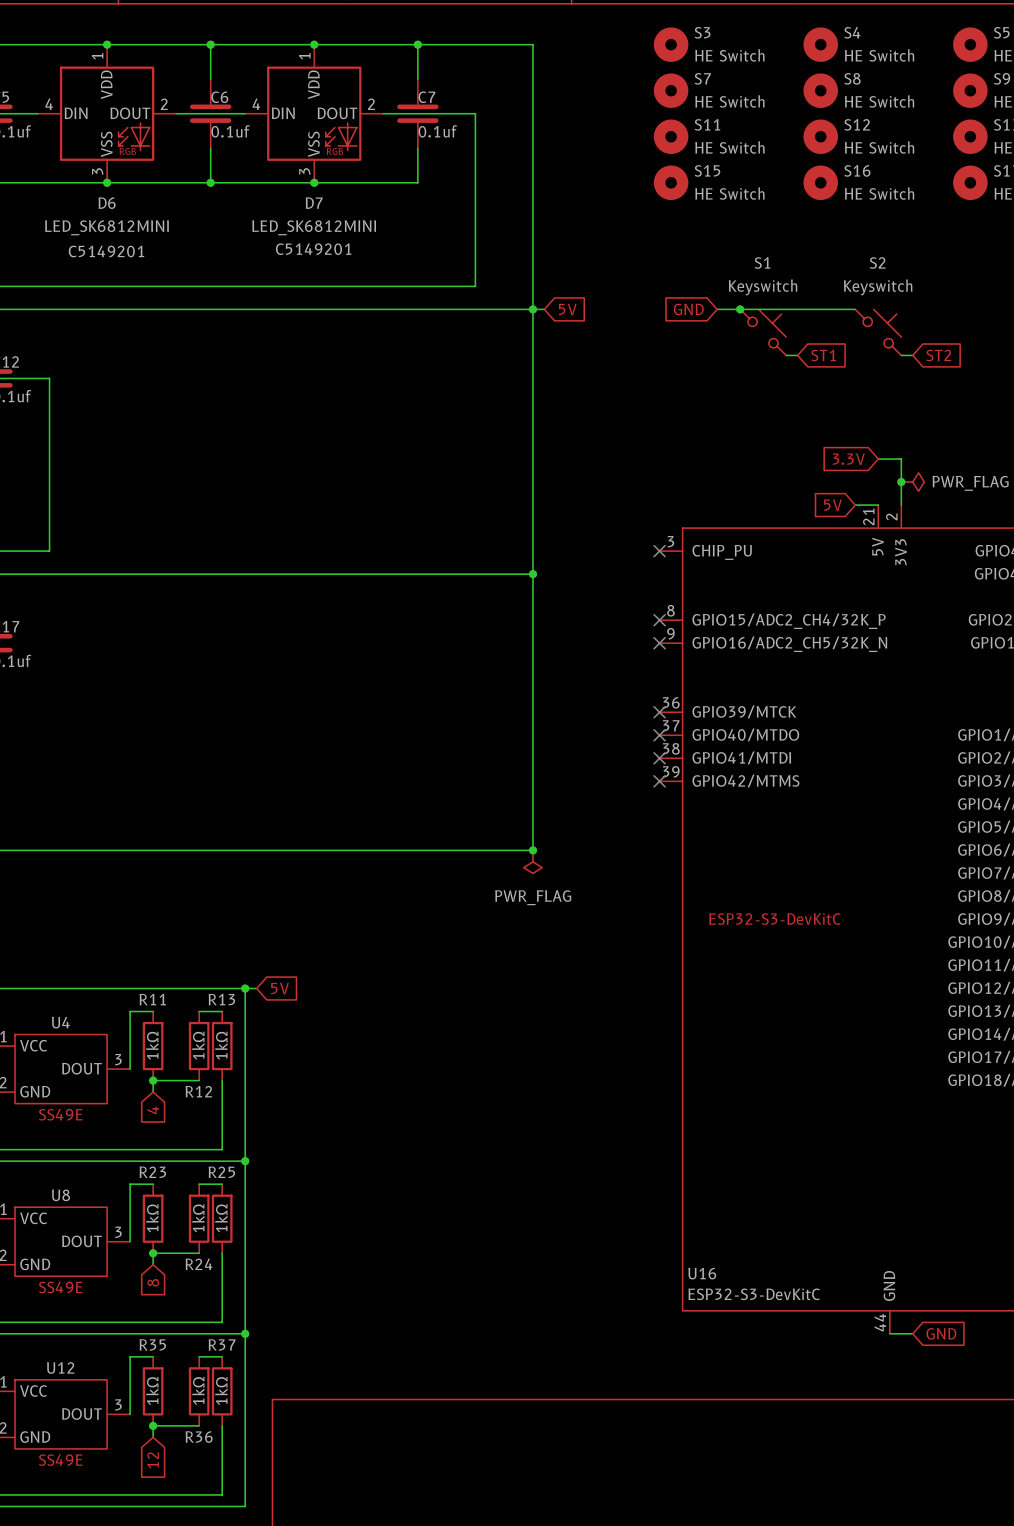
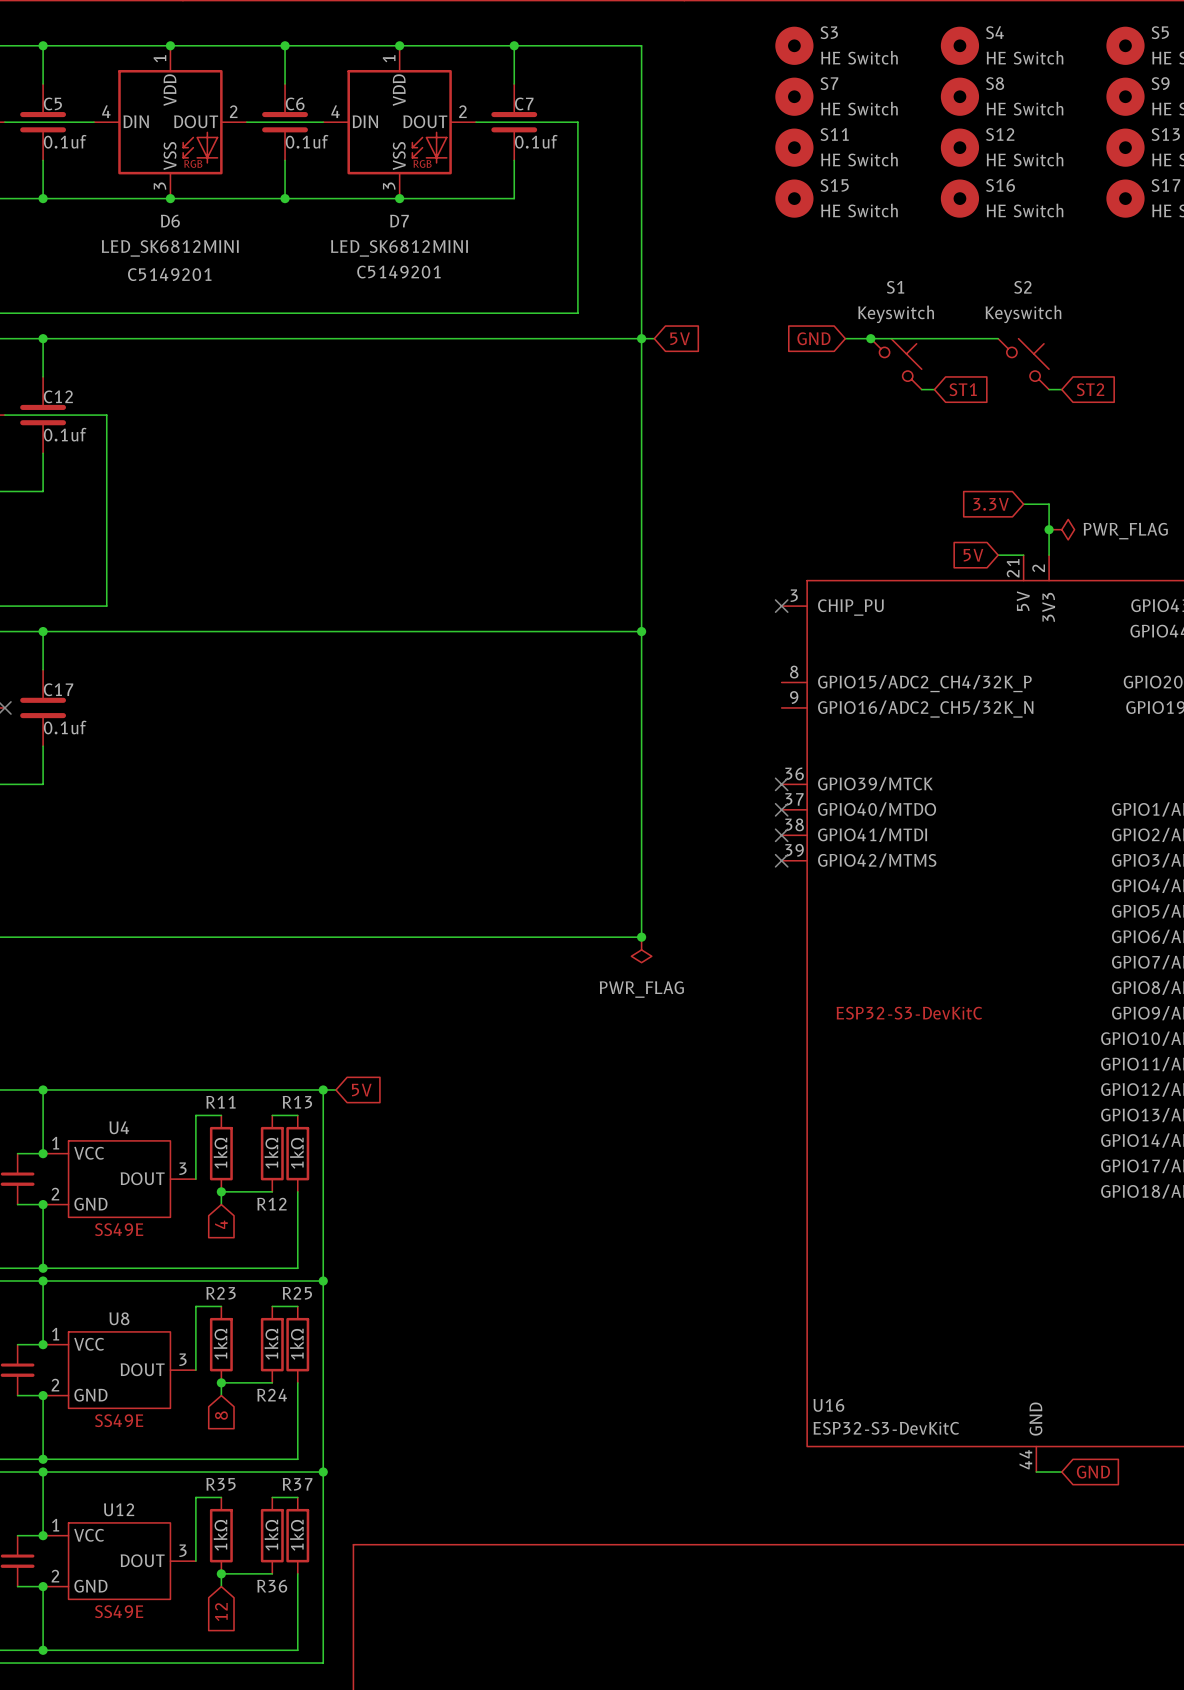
no-connect mark: (659, 620) -> none
no-connect mark: (659, 643) -> none

